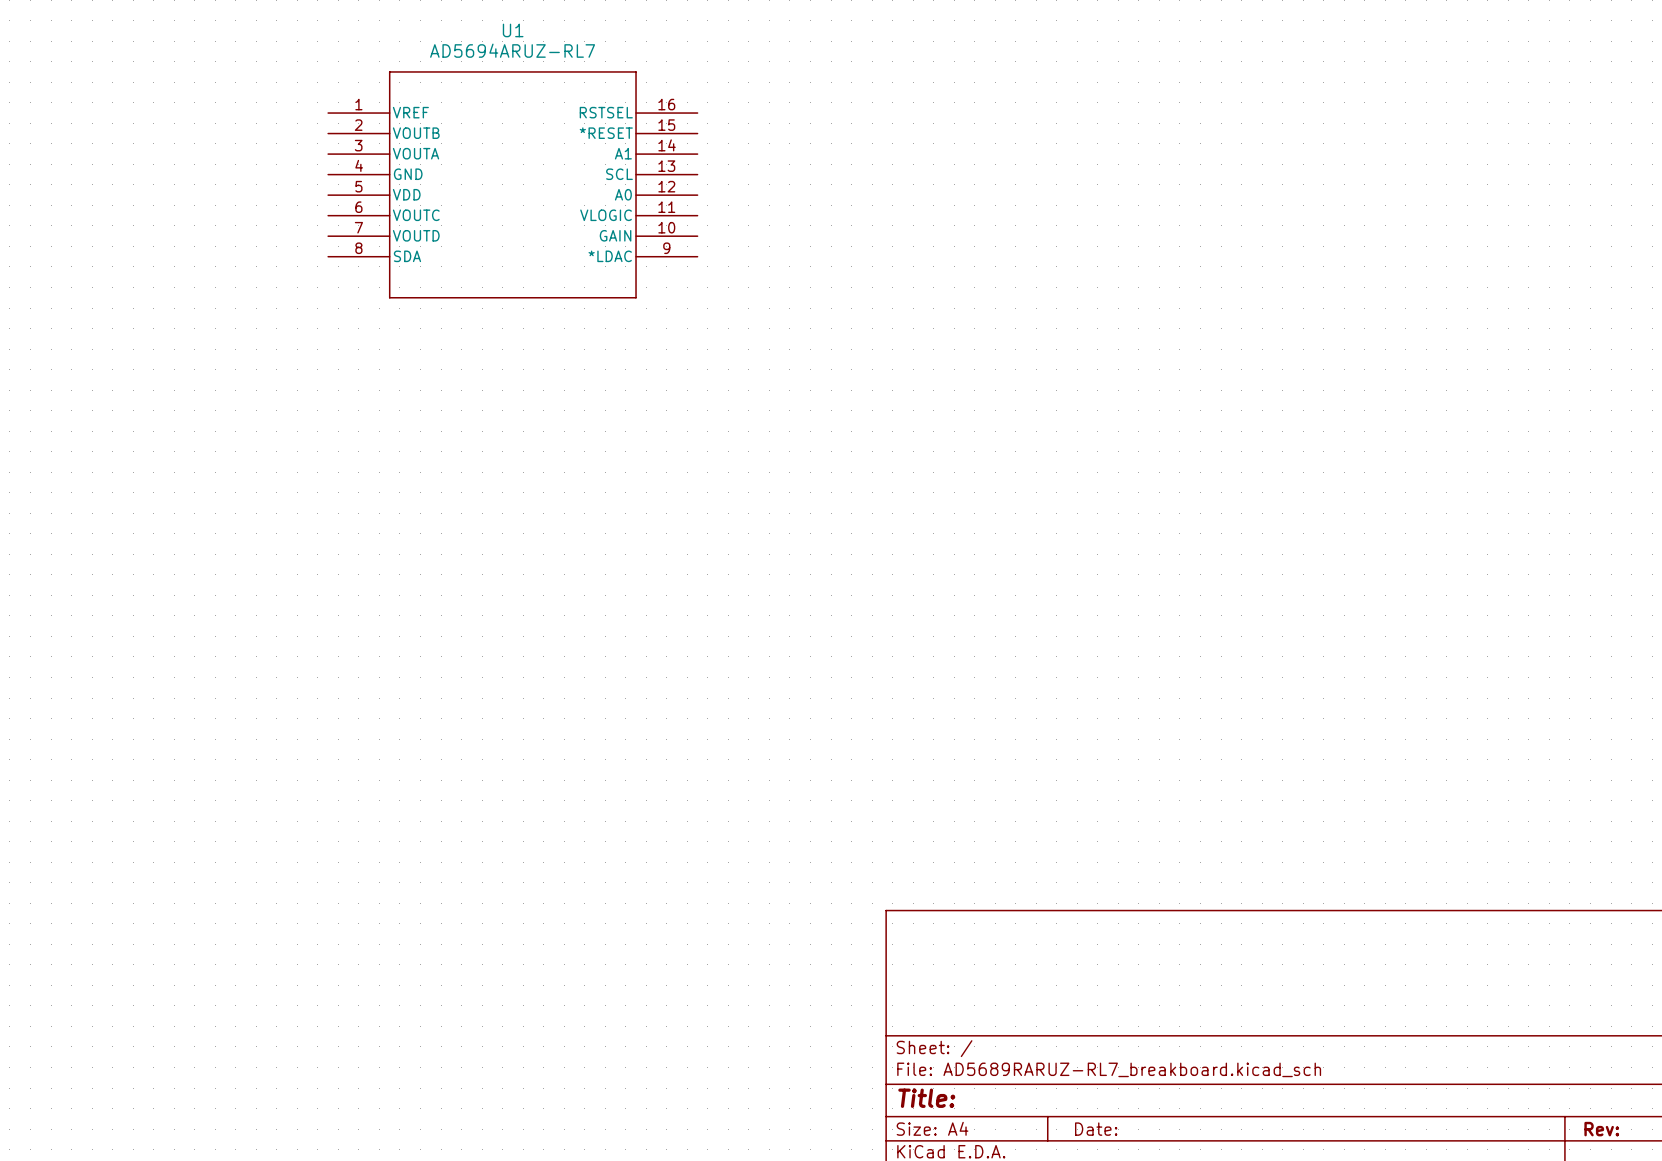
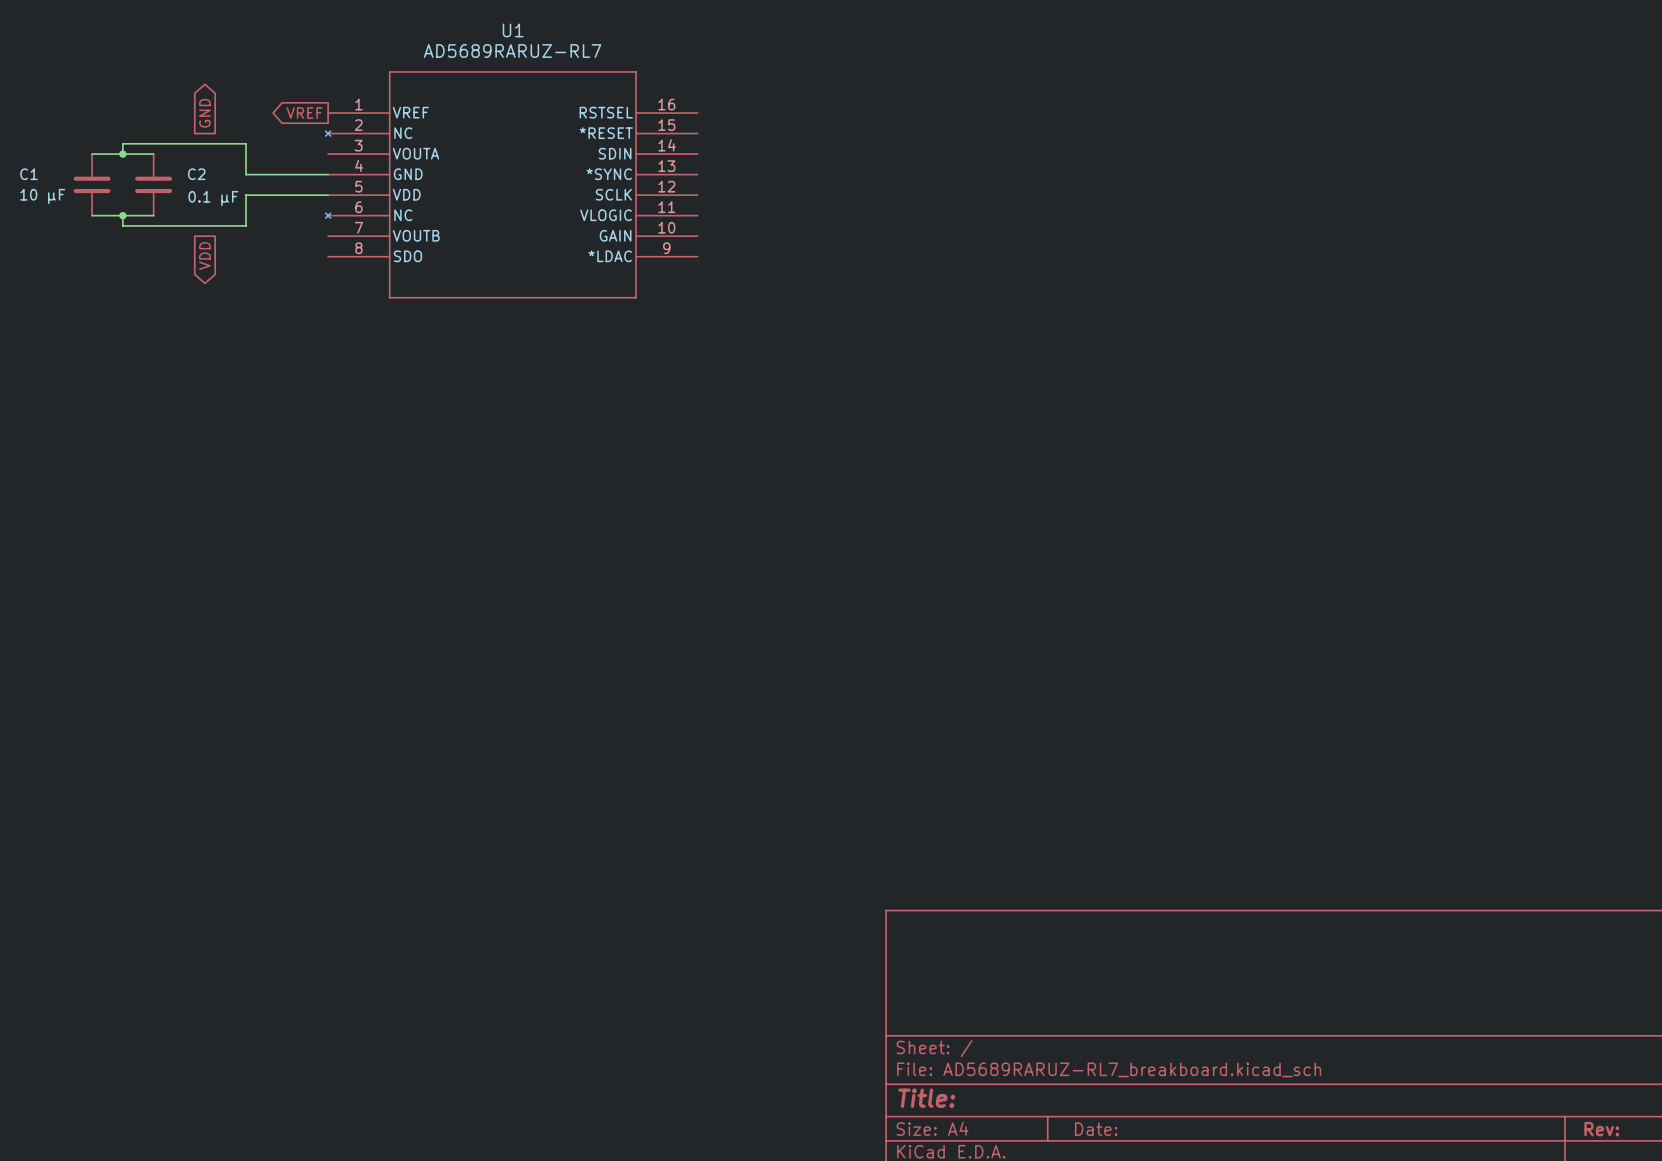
U1 value: AD5694ARUZ-RL7 (512, 50) -> AD5689RARUZ-RL7 (512, 50)
U1 symbol: [328, 71, 698, 299] -> [325, 71, 698, 299]
global label: none -> GND (204, 113)
global label: none -> VREF (304, 113)
wire: none -> (92, 154) (153, 154)
wire: none -> (122, 154) (122, 143) (246, 143) (246, 174) (328, 174)
junction: none -> (122, 154)
C1: none -> 10 μF (92, 184)
C2: none -> 0.1 μF (153, 184)
wire: none -> (328, 195) (246, 195) (246, 225) (122, 225) (122, 215)
wire: none -> (92, 215) (153, 215)
junction: none -> (122, 215)
global label: none -> VDD (204, 255)

